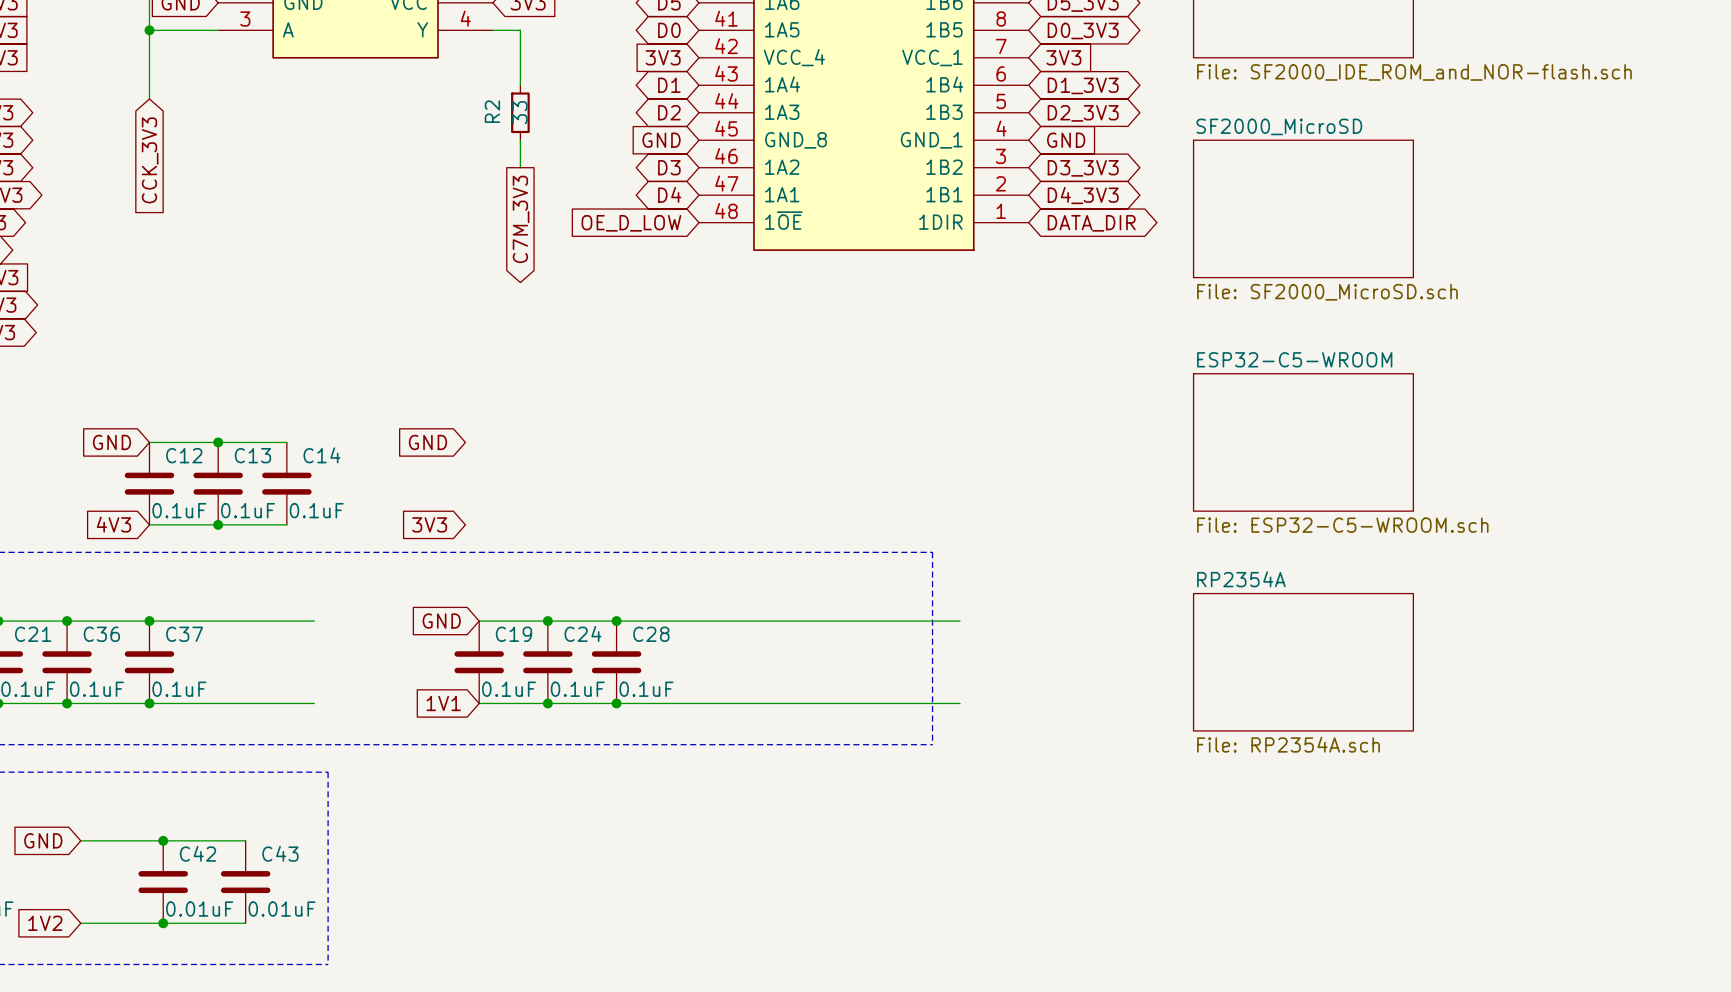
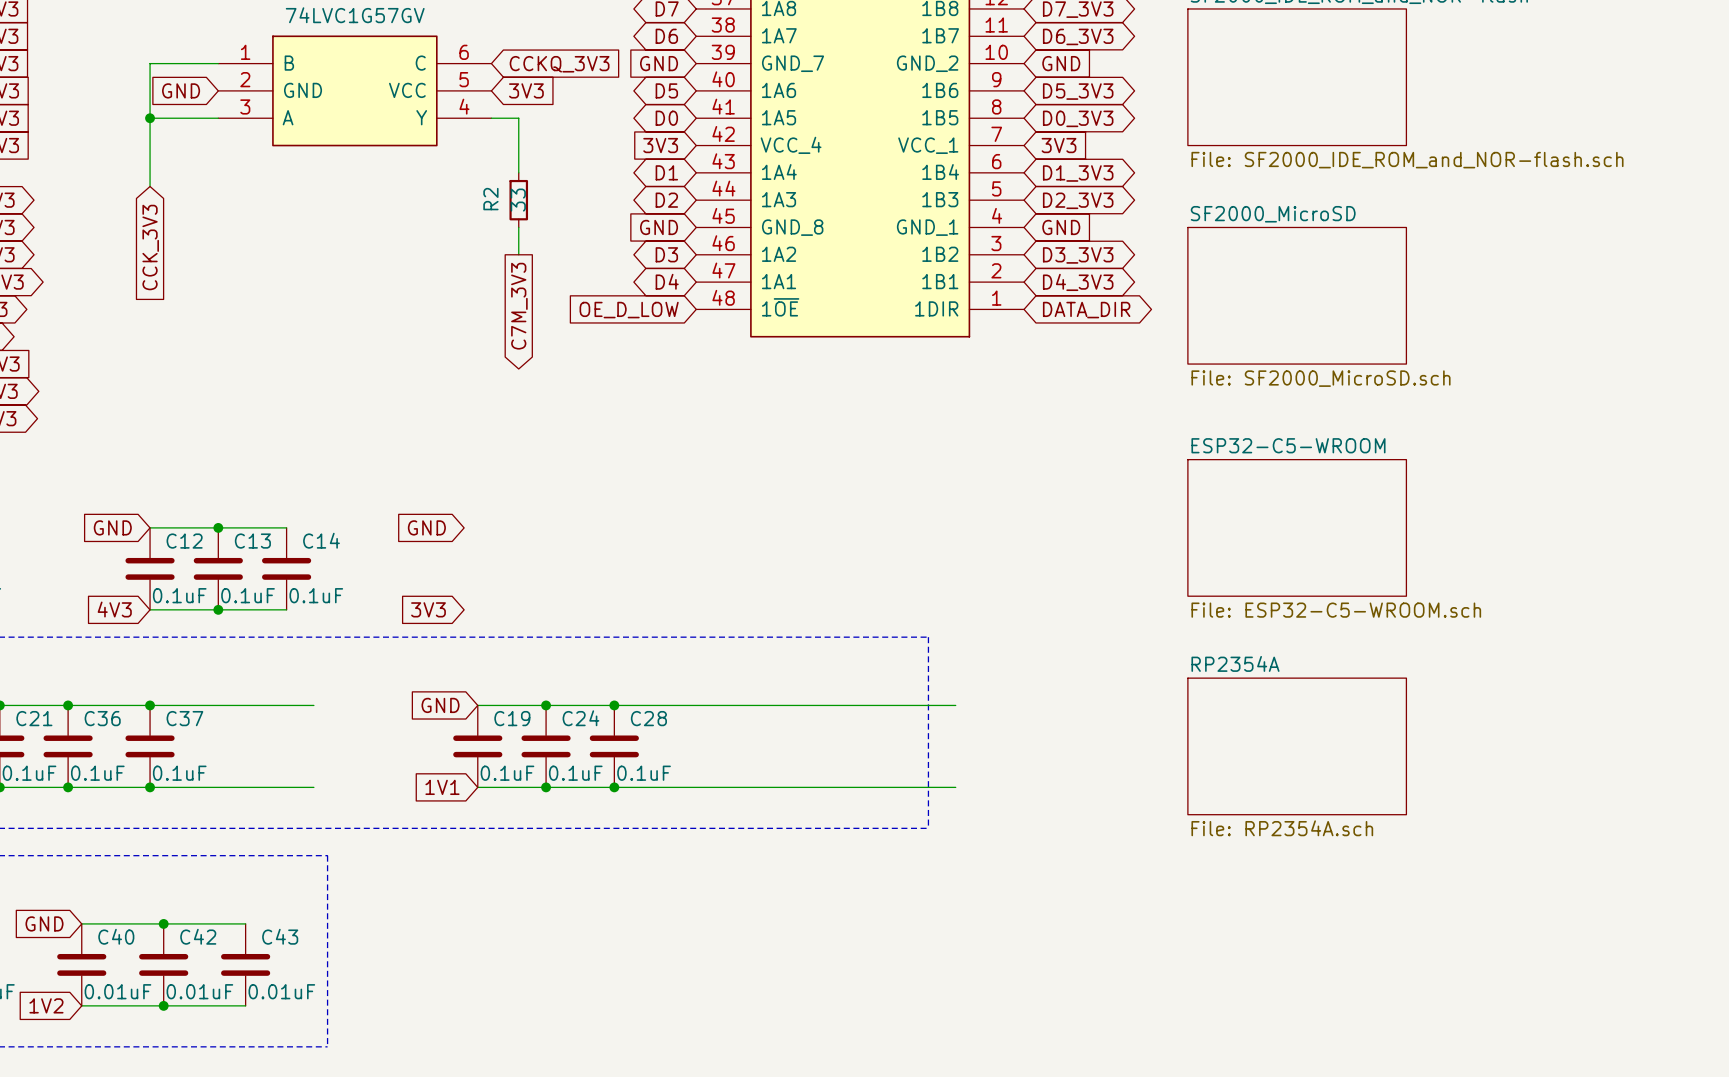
C40: none -> 0.01uF (81, 964)

